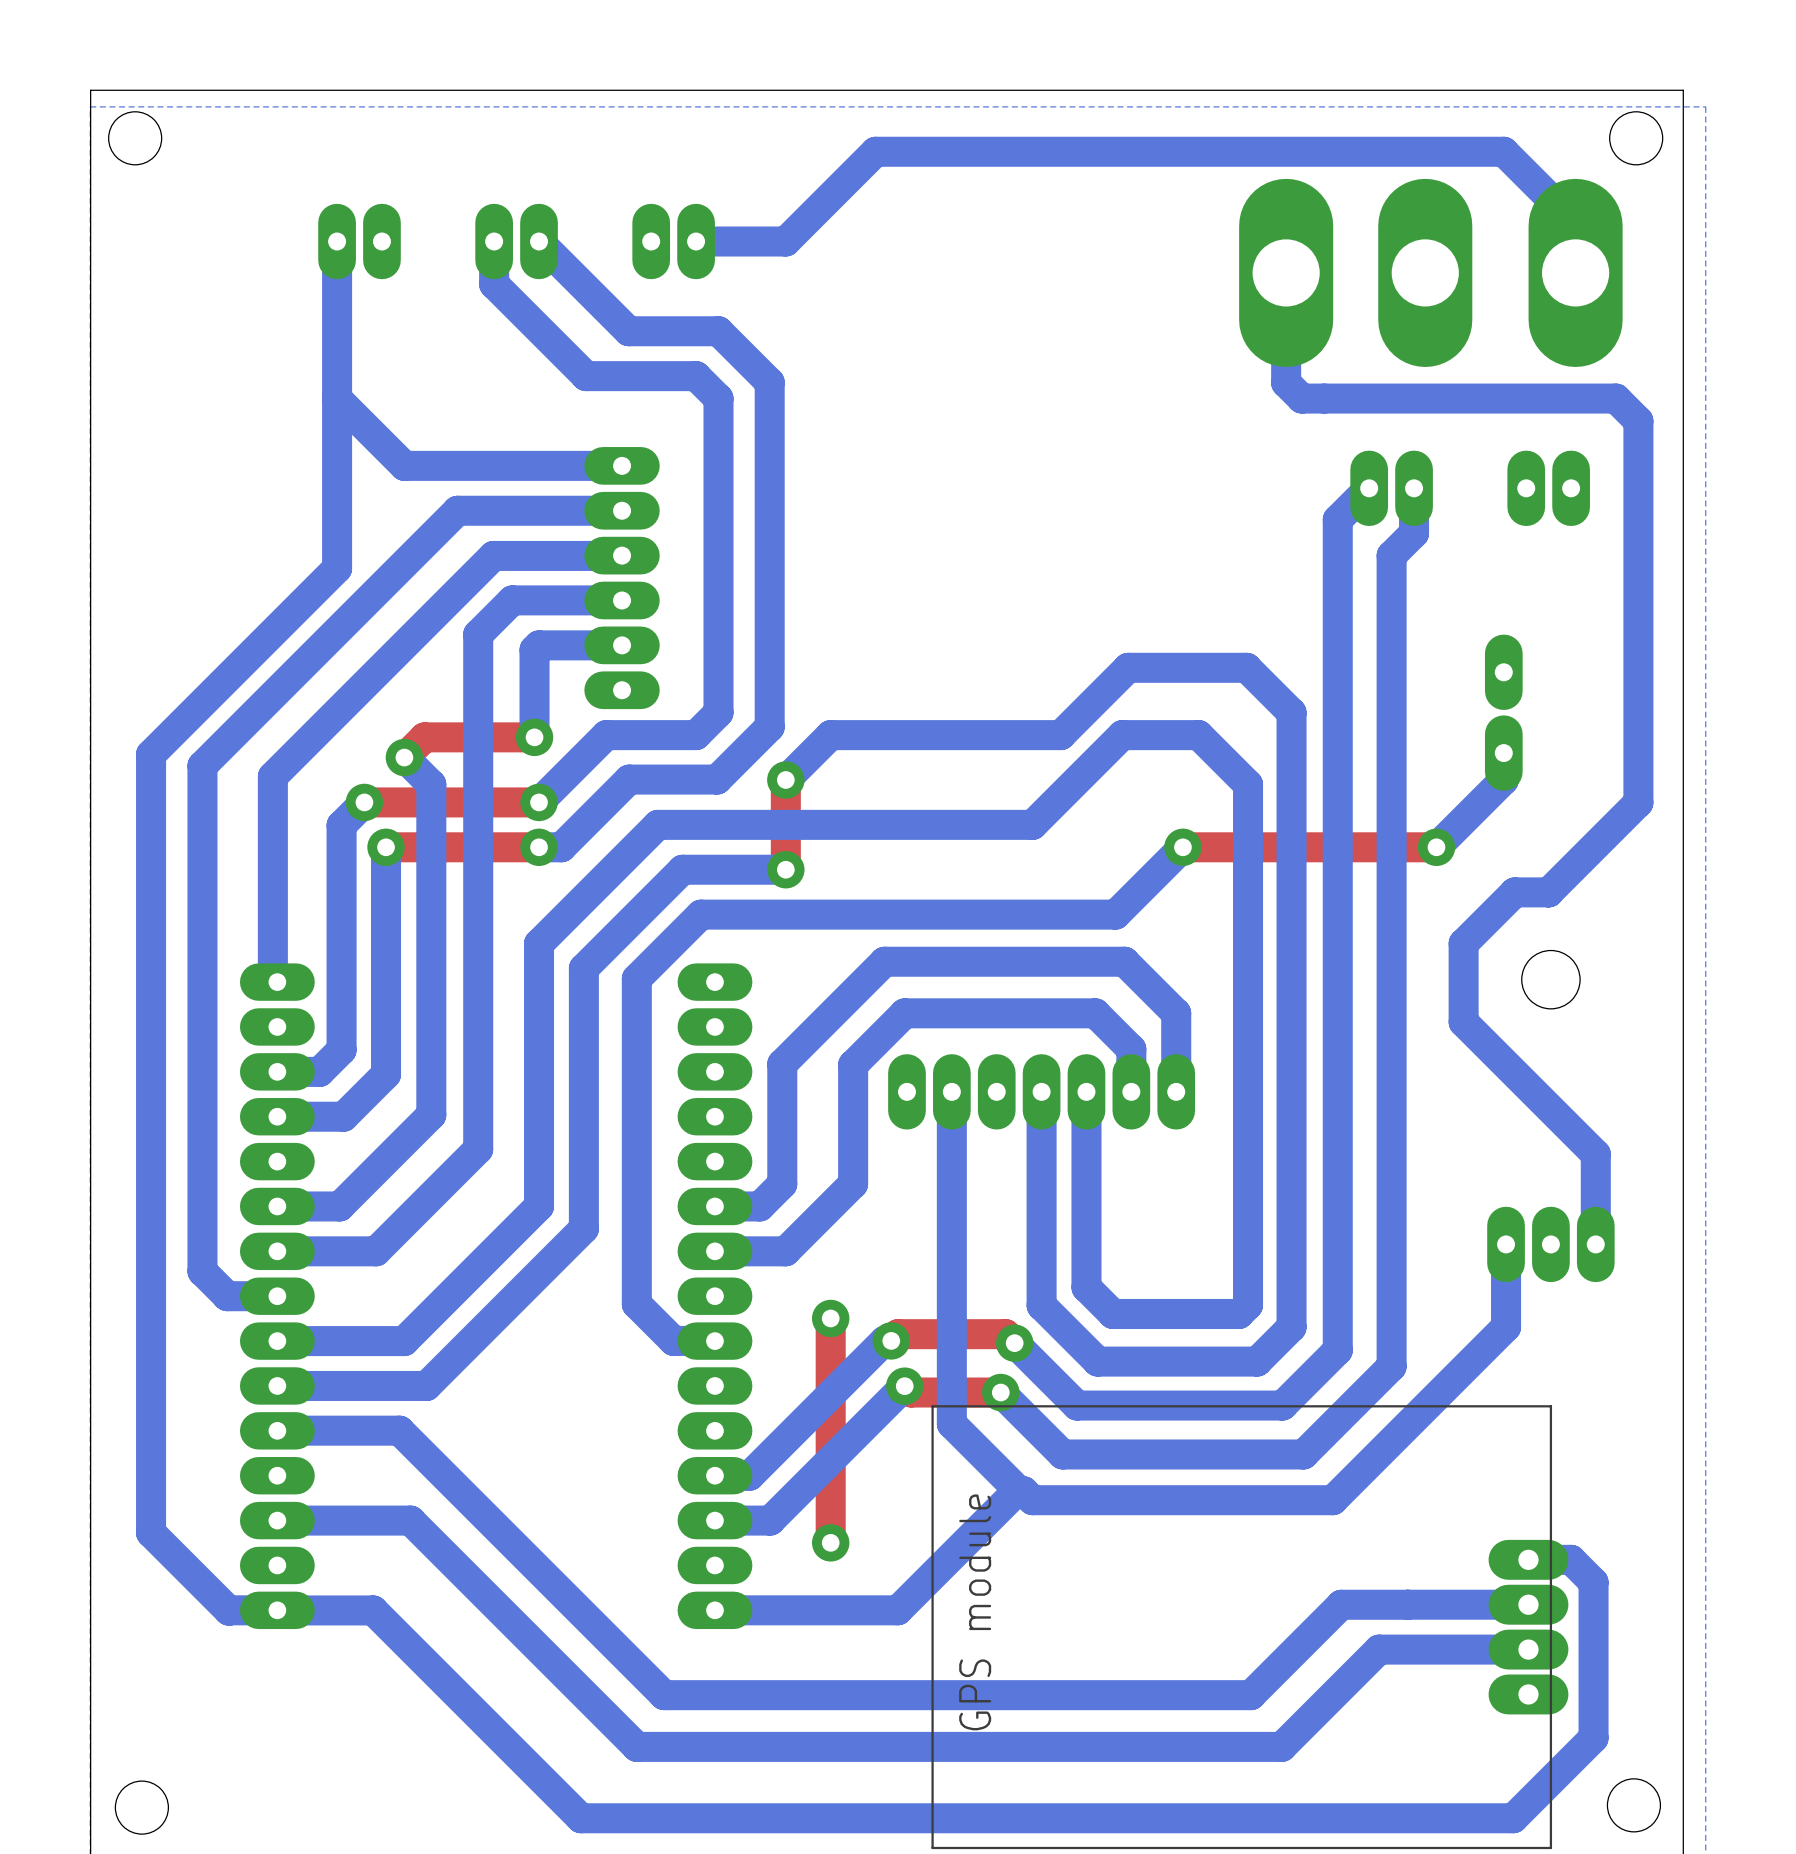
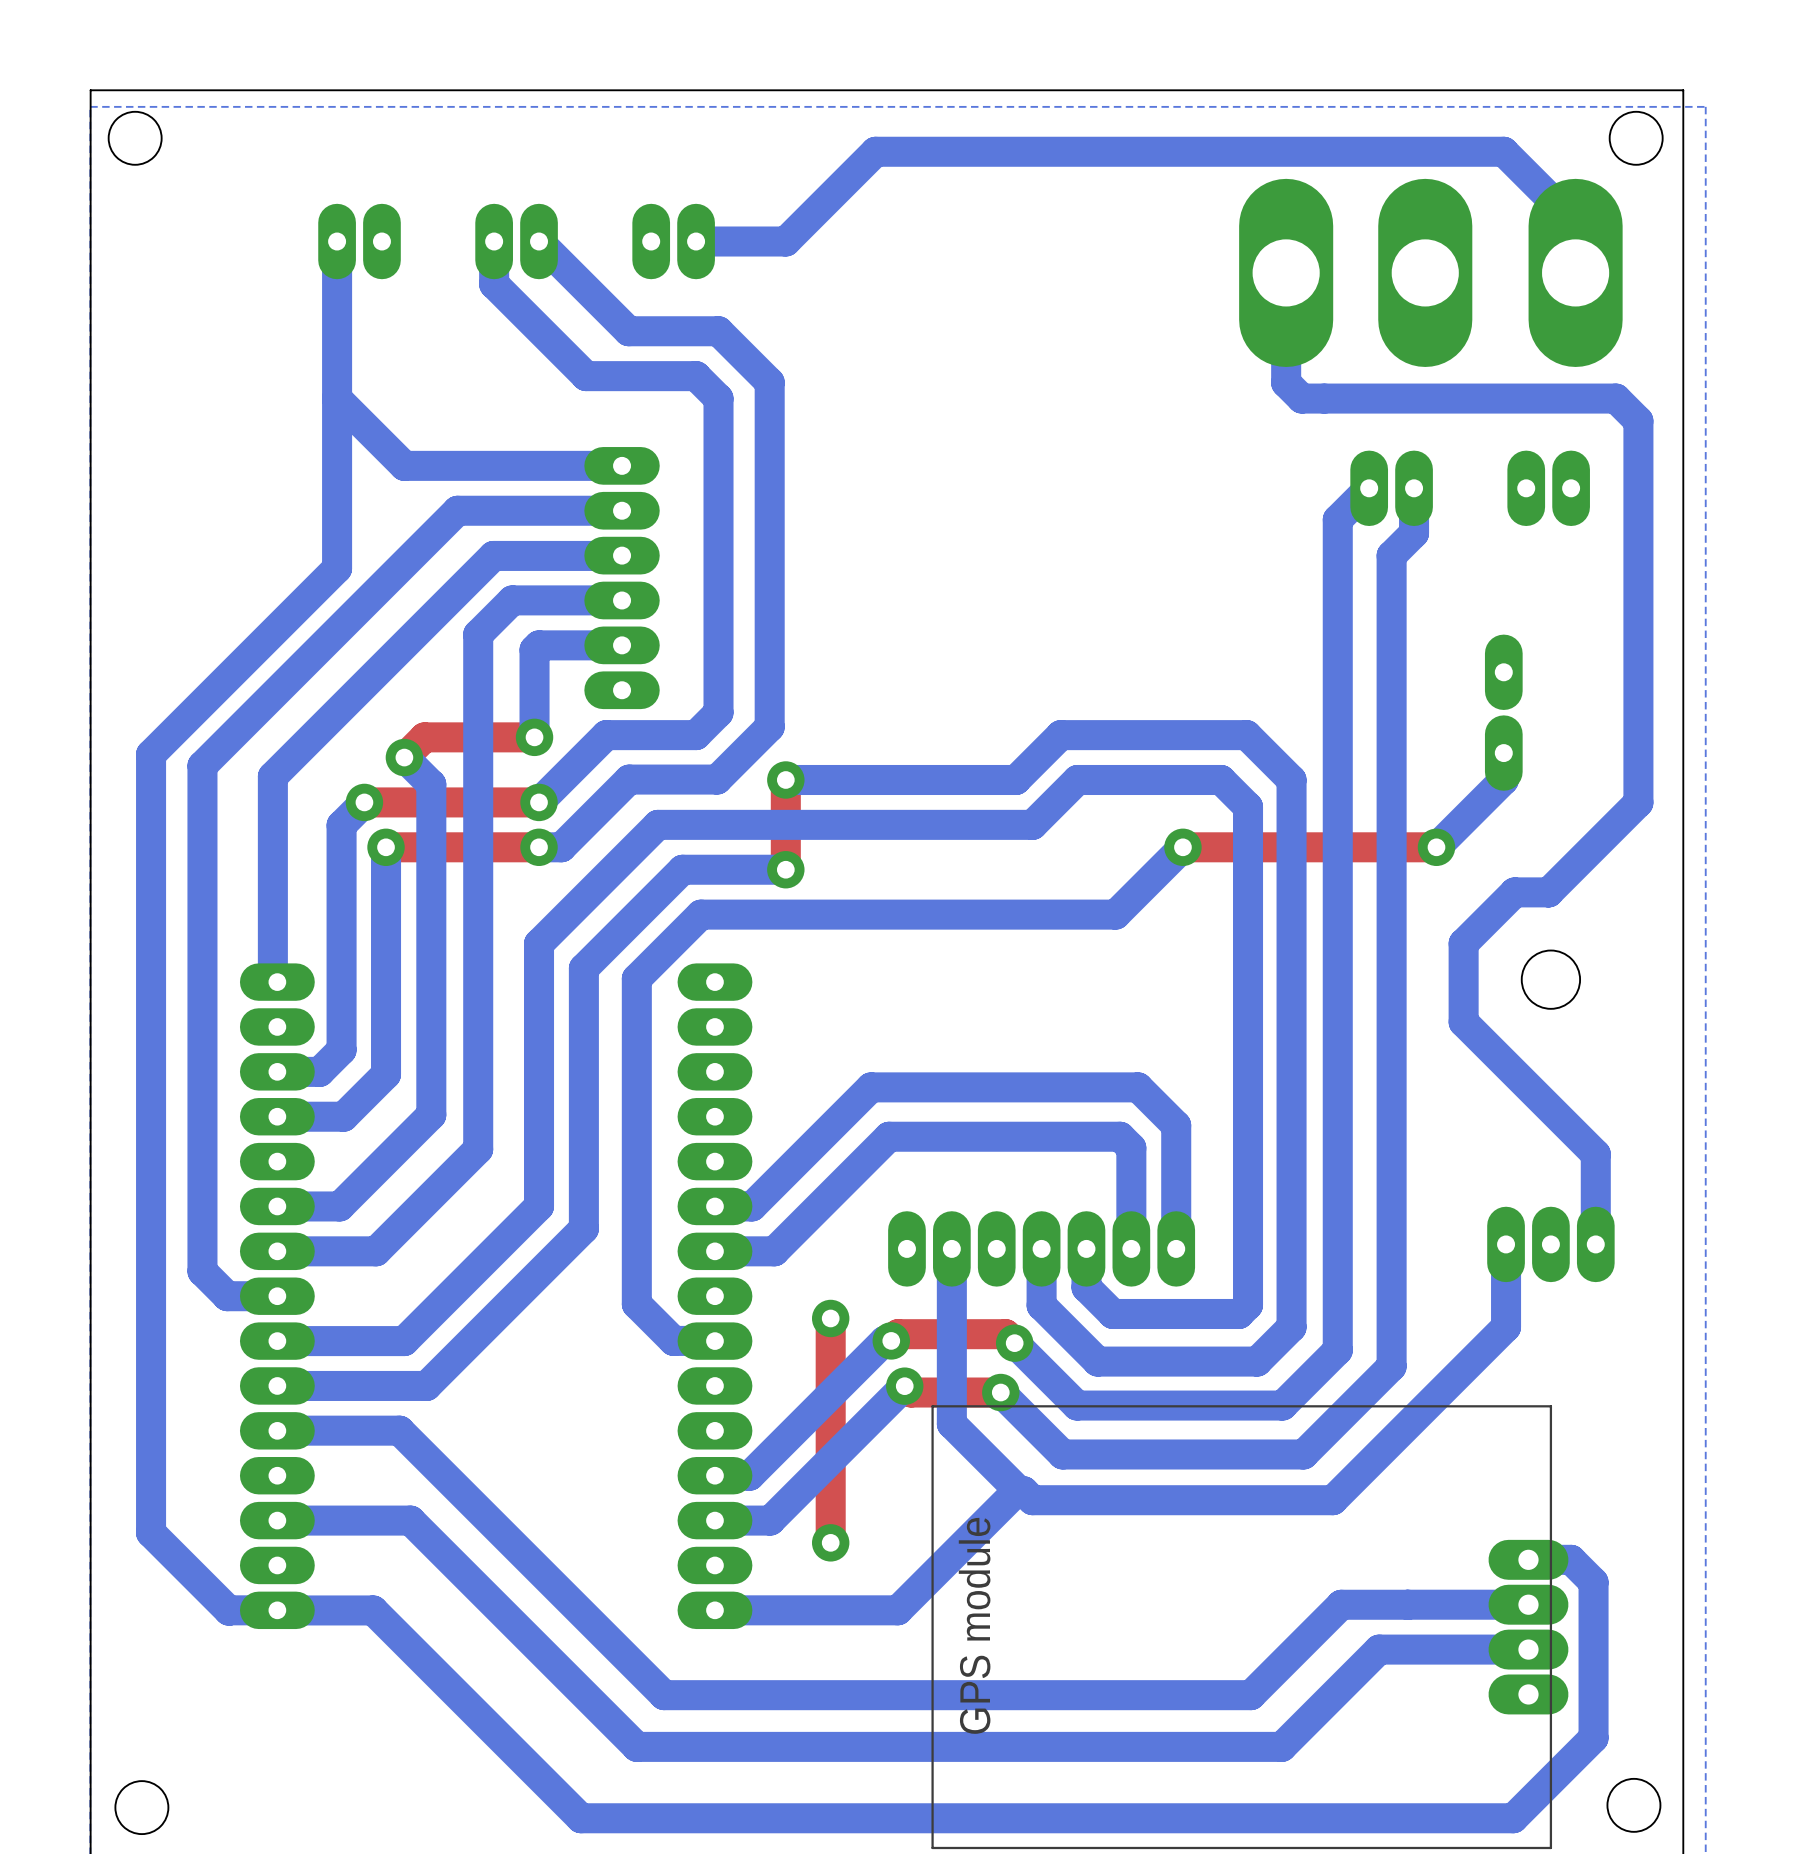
bottom track: (1122, 735) (1077, 779) -> (1248, 806) (1221, 779) (1077, 779)
bottom track: (1198, 735) (1248, 784) (1248, 806) -> (1198, 735) (1246, 735) (1291, 779)
bottom track: (1291, 779) (1291, 712) (1246, 667) (1128, 667) (1060, 735) (830, 735) (785, 779) -> (1122, 735) (1060, 735) (1015, 779) (785, 779)
bottom track: (951, 1091) (951, 1248) -> none
bottom track: (1041, 1091) (1041, 1248) -> none
part position: (1041, 1091) -> (1041, 1248)
bottom track: (1086, 1091) (1086, 1248) -> none
bottom track: (1131, 1091) (1131, 1049) (1095, 1013) (904, 1013) (853, 1064) (853, 1183) (785, 1251) (774, 1251) -> (1131, 1248) (1131, 1147) (1120, 1136) (889, 1136) (774, 1251)
bottom track: (1176, 1091) (1176, 1013) (1124, 961) (884, 961) (782, 1063) (782, 1184) (759, 1206) (751, 1206) -> (1176, 1248) (1176, 1125) (1138, 1087) (871, 1087) (751, 1206)

